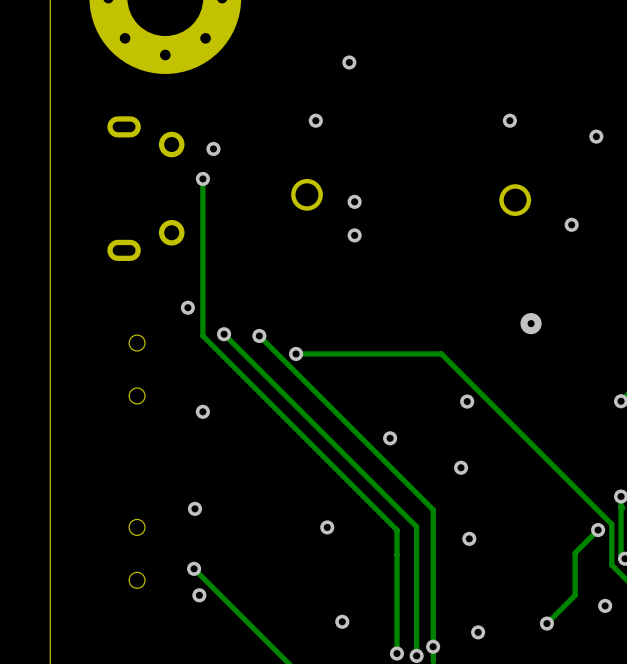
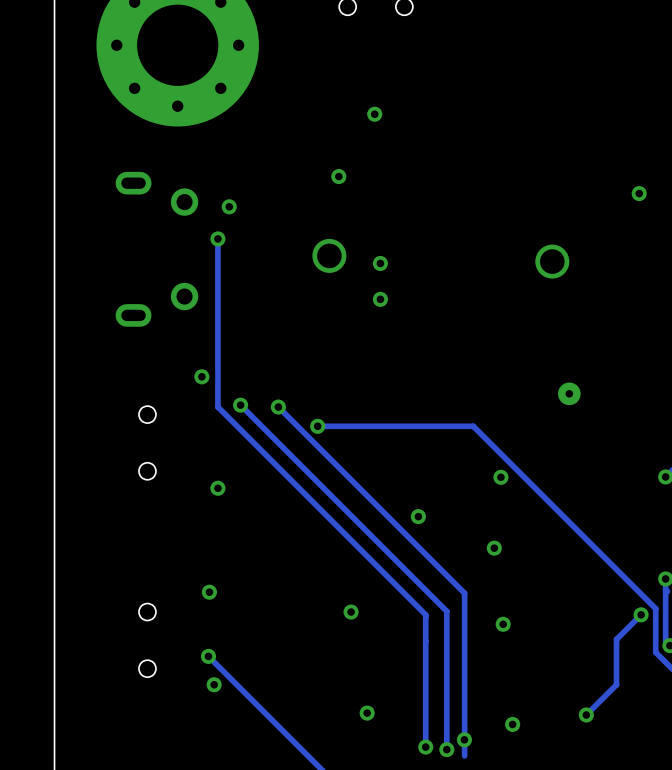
via: (509, 120) -> none
via: (571, 224) -> none
via: (605, 605) -> none

